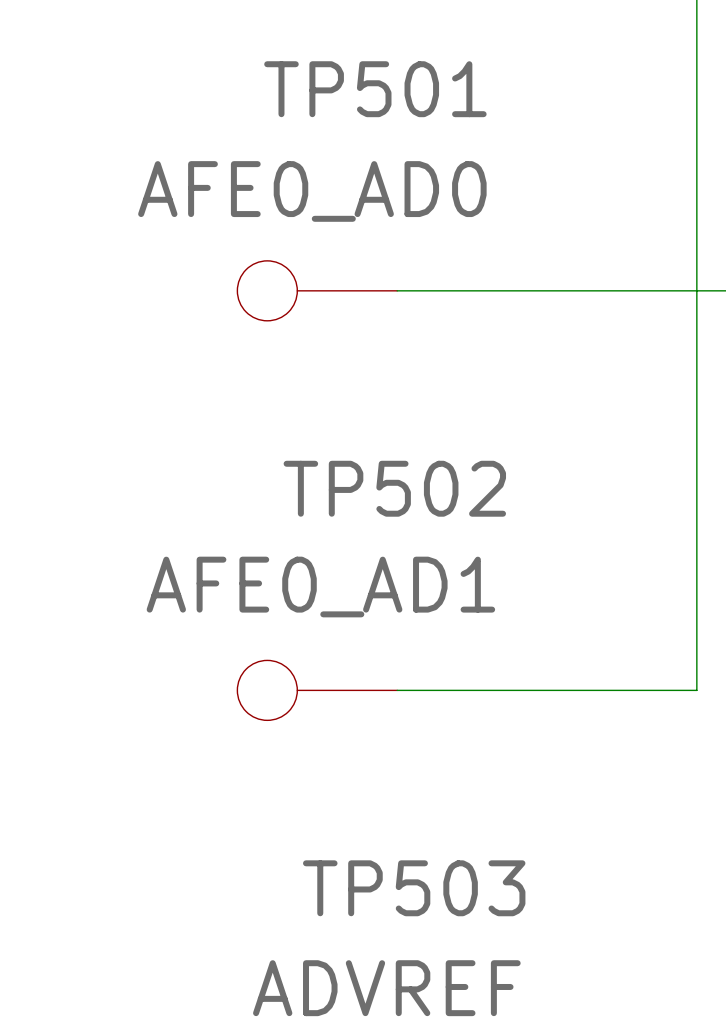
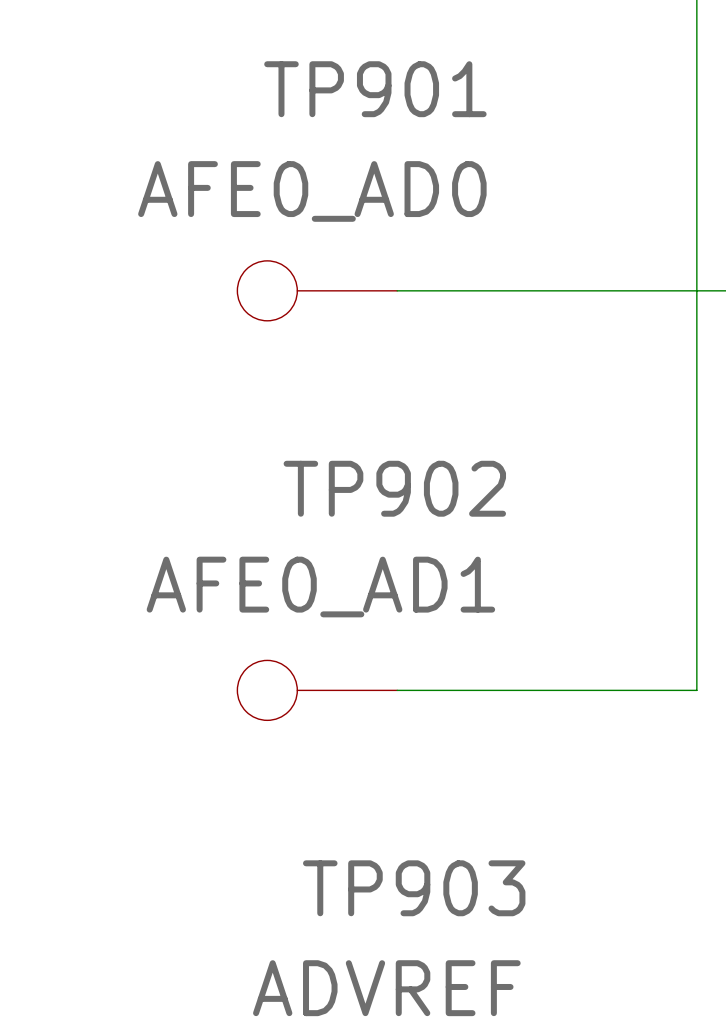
TP501 name: TP501 (375, 89) -> TP901 (375, 89)
TP502 name: TP502 (394, 488) -> TP902 (394, 488)
TP503 name: TP503 (414, 888) -> TP903 (414, 888)

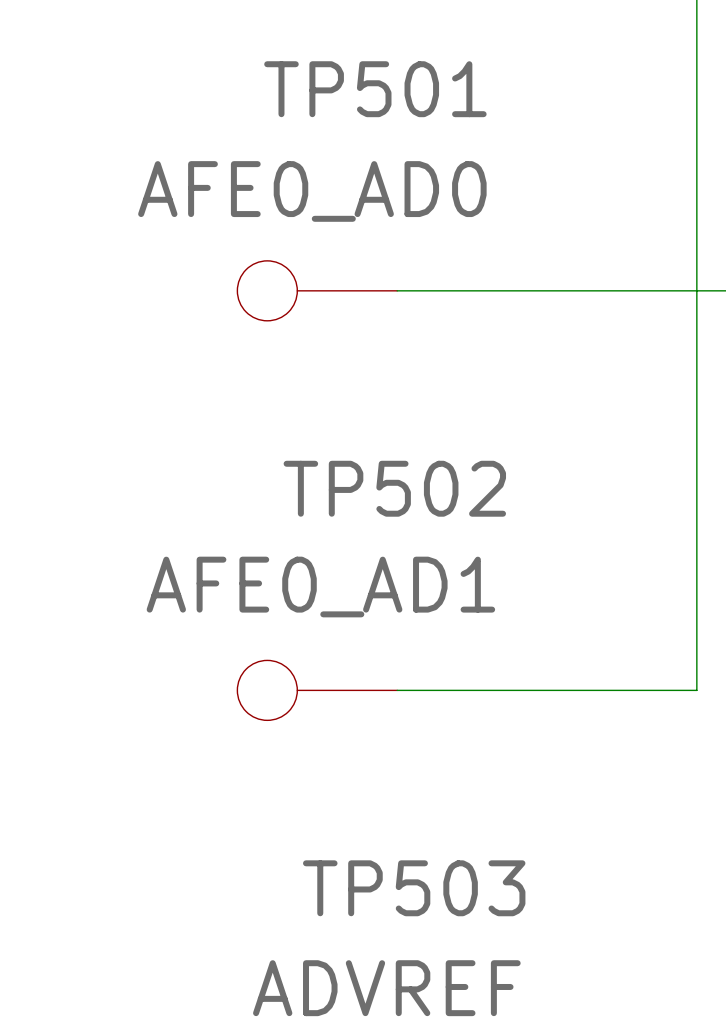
TP901 name: TP901 (375, 89) -> TP501 (375, 89)
TP902 name: TP902 (394, 488) -> TP502 (394, 488)
TP903 name: TP903 (414, 888) -> TP503 (414, 888)

